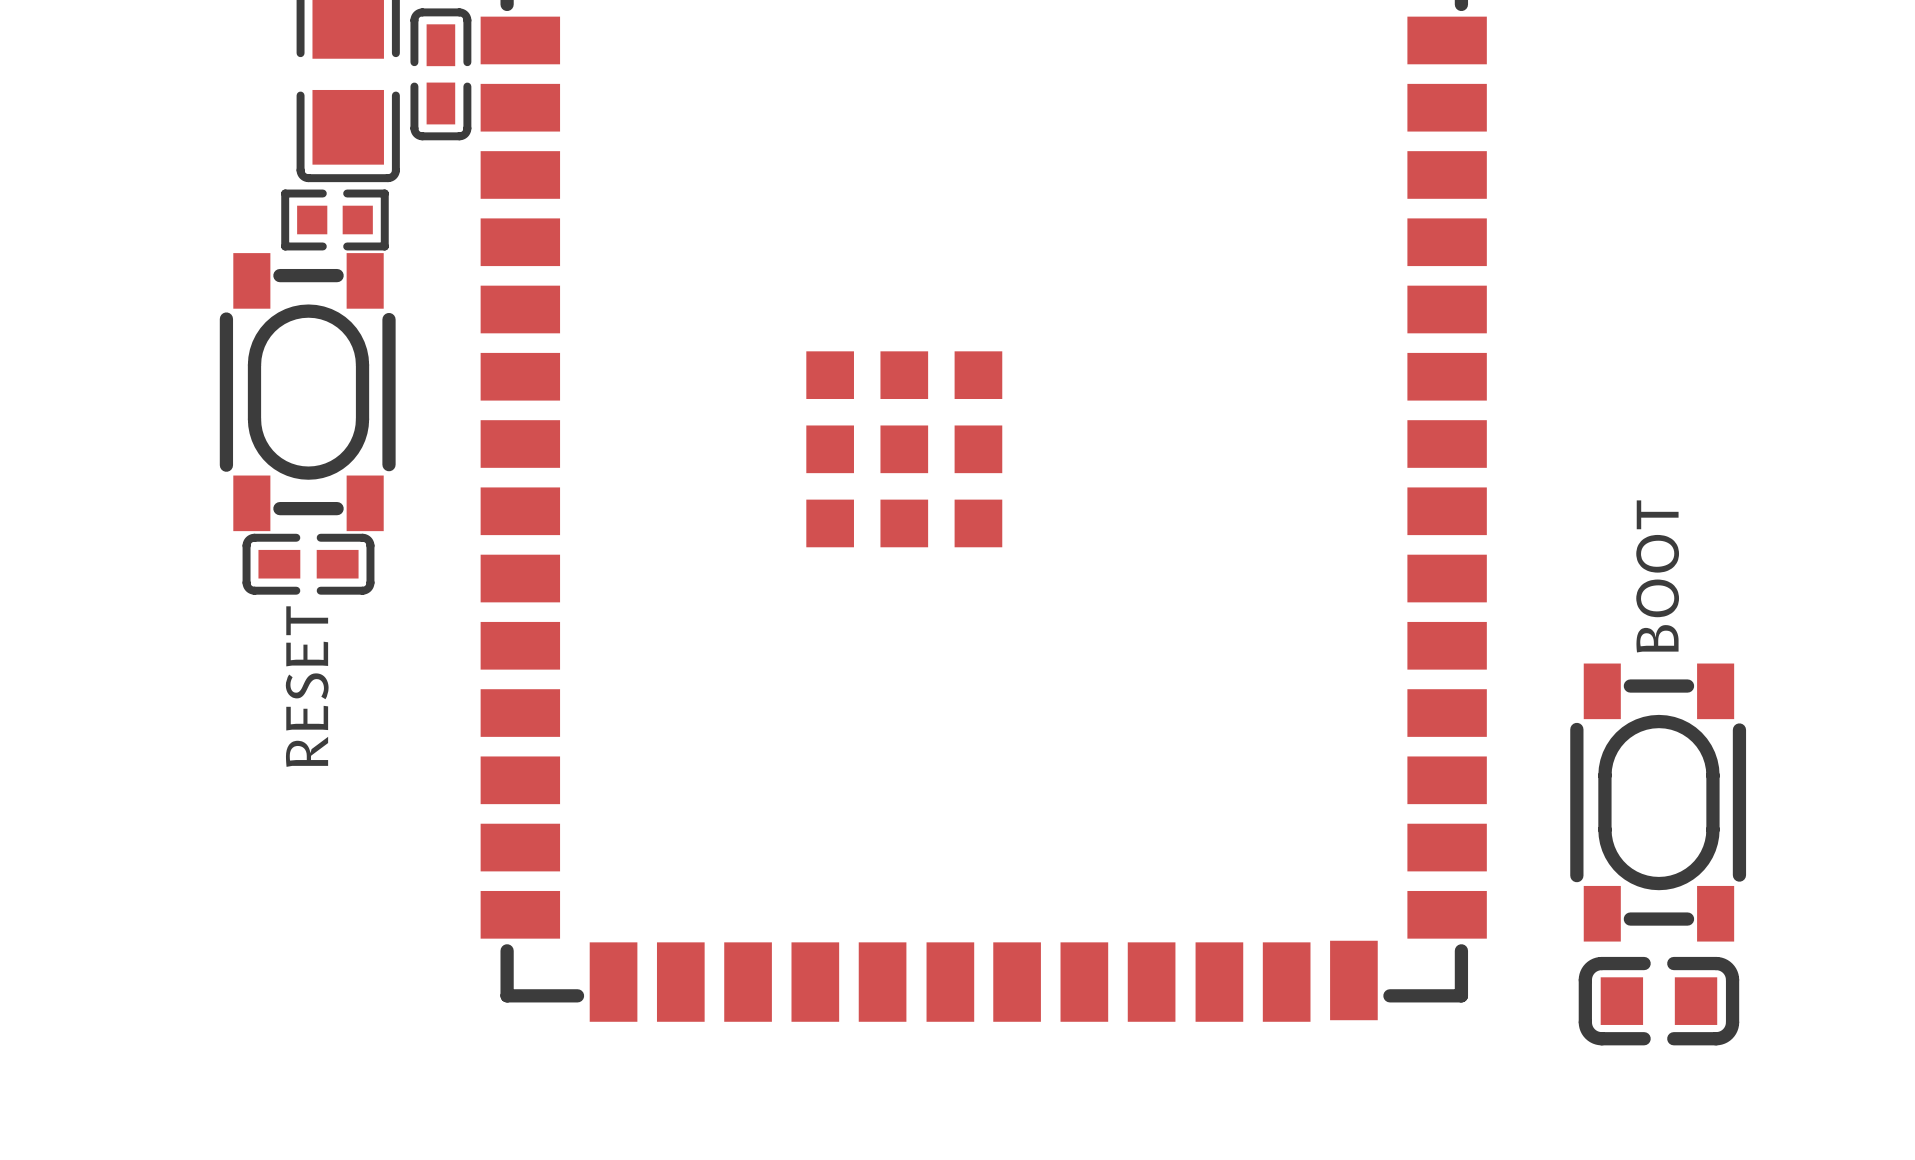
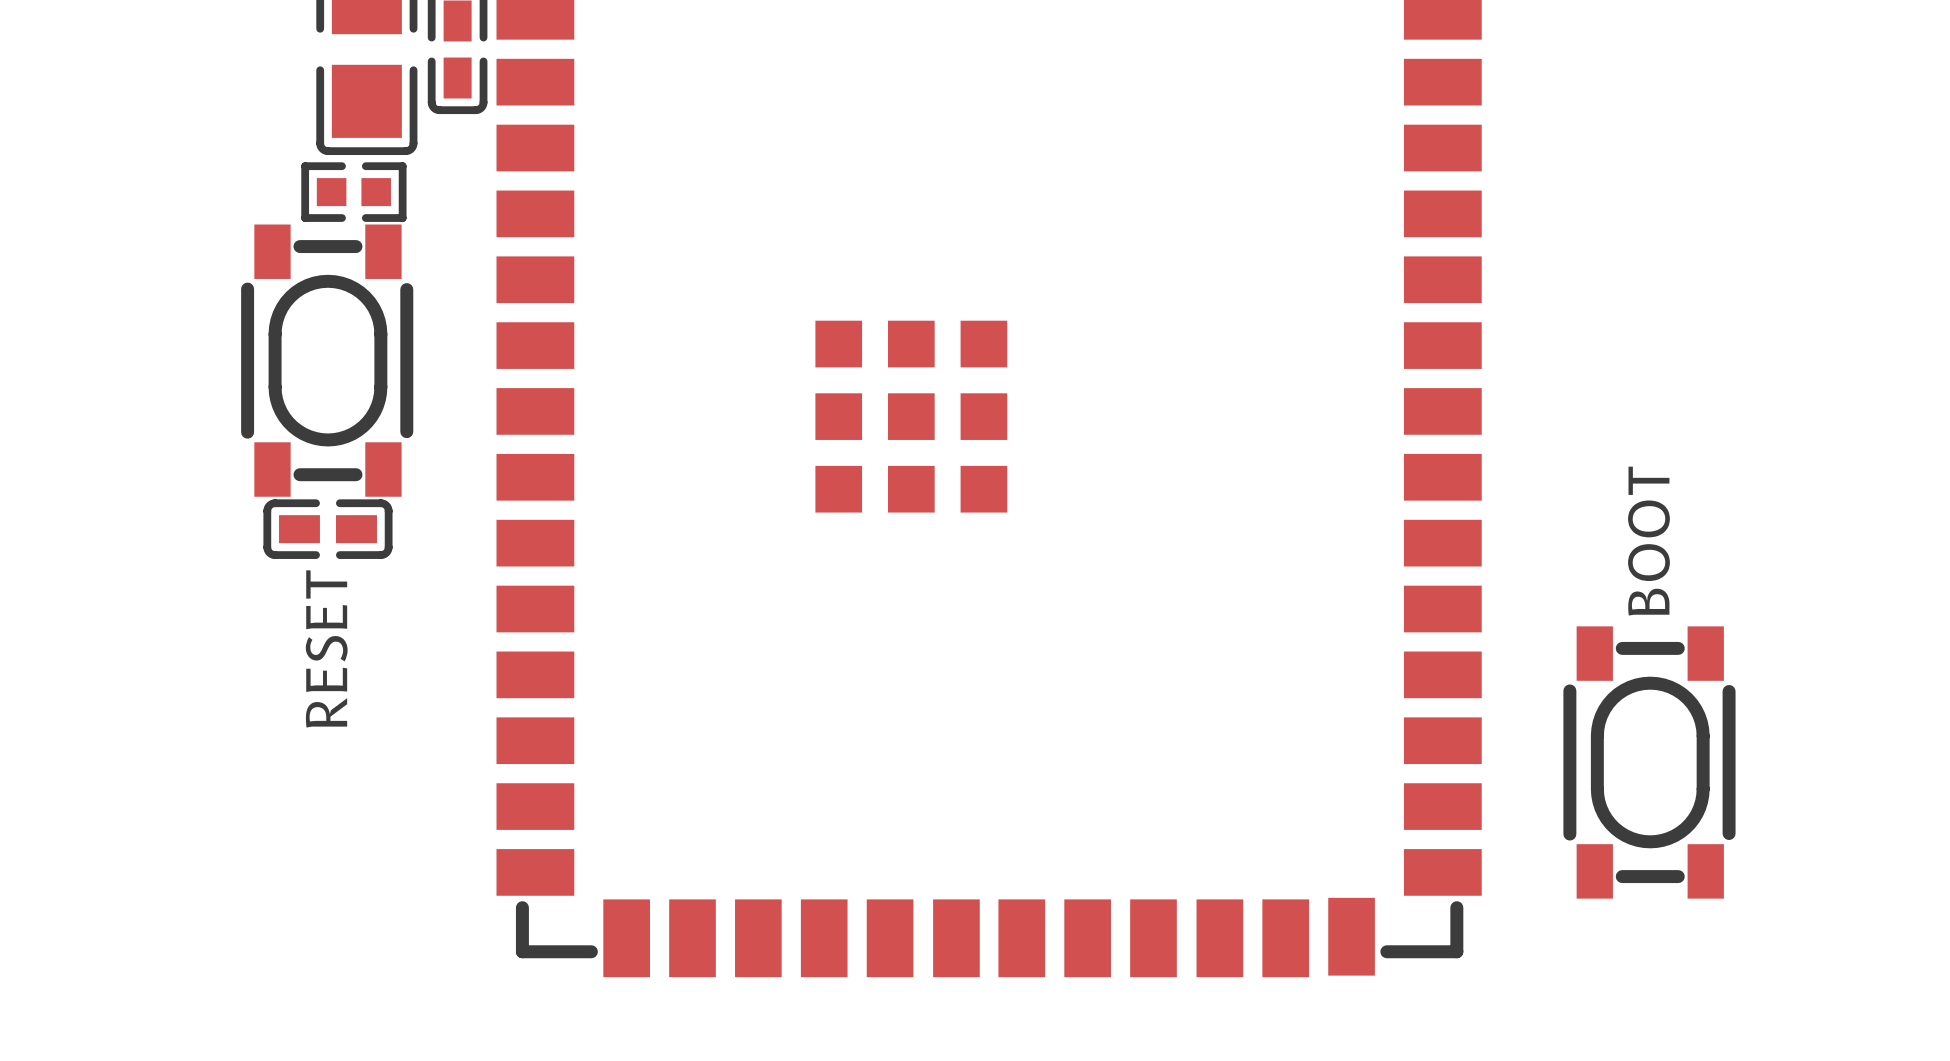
part: (1658, 1001) -> none

